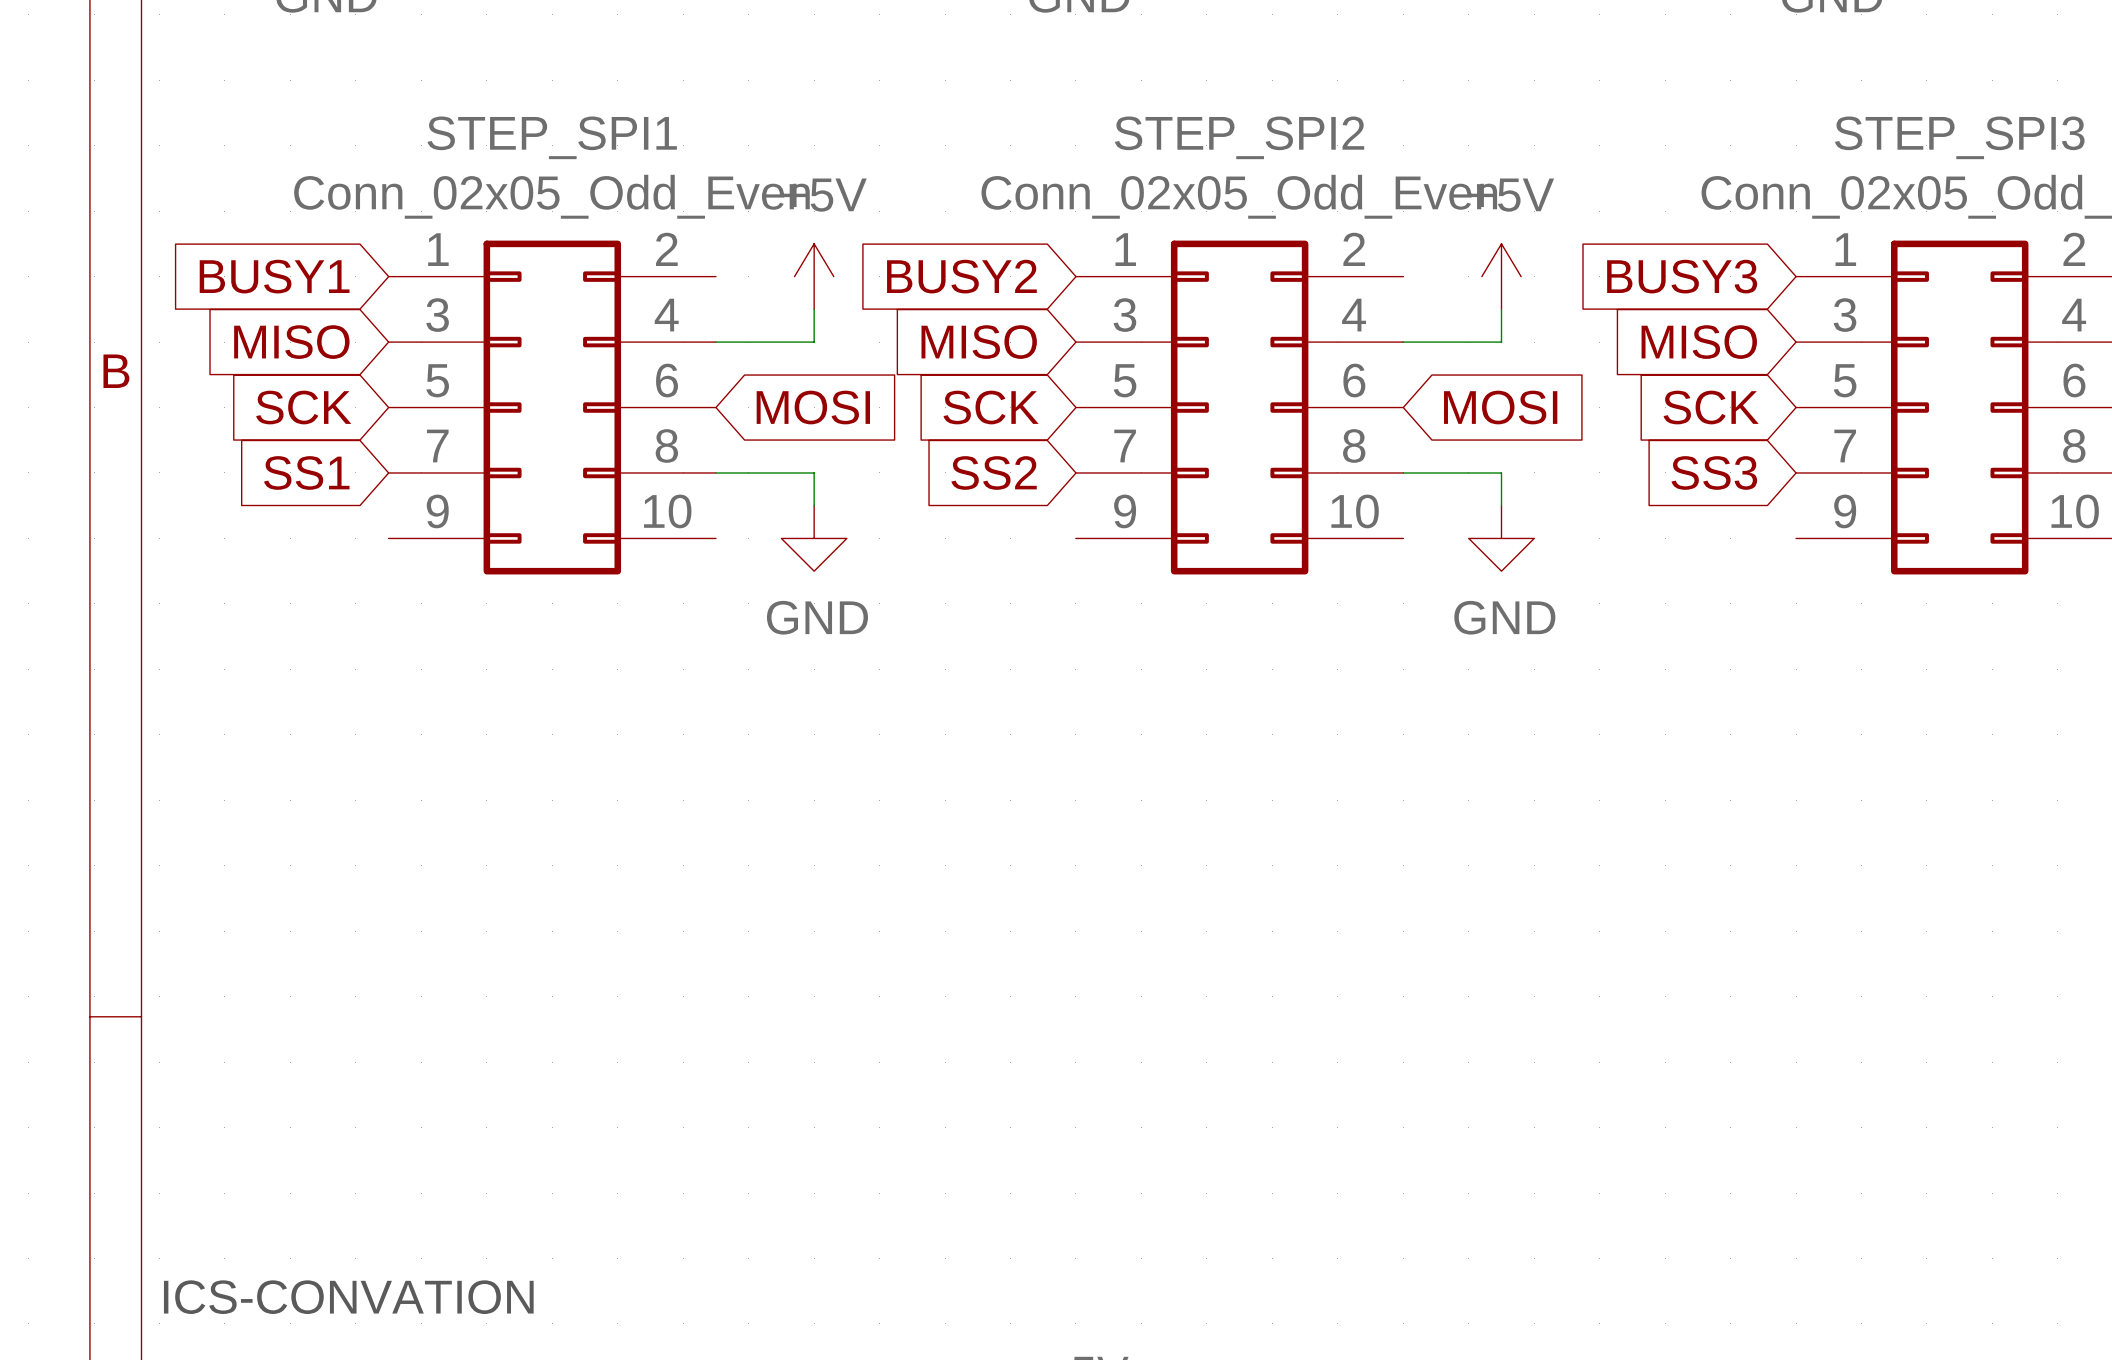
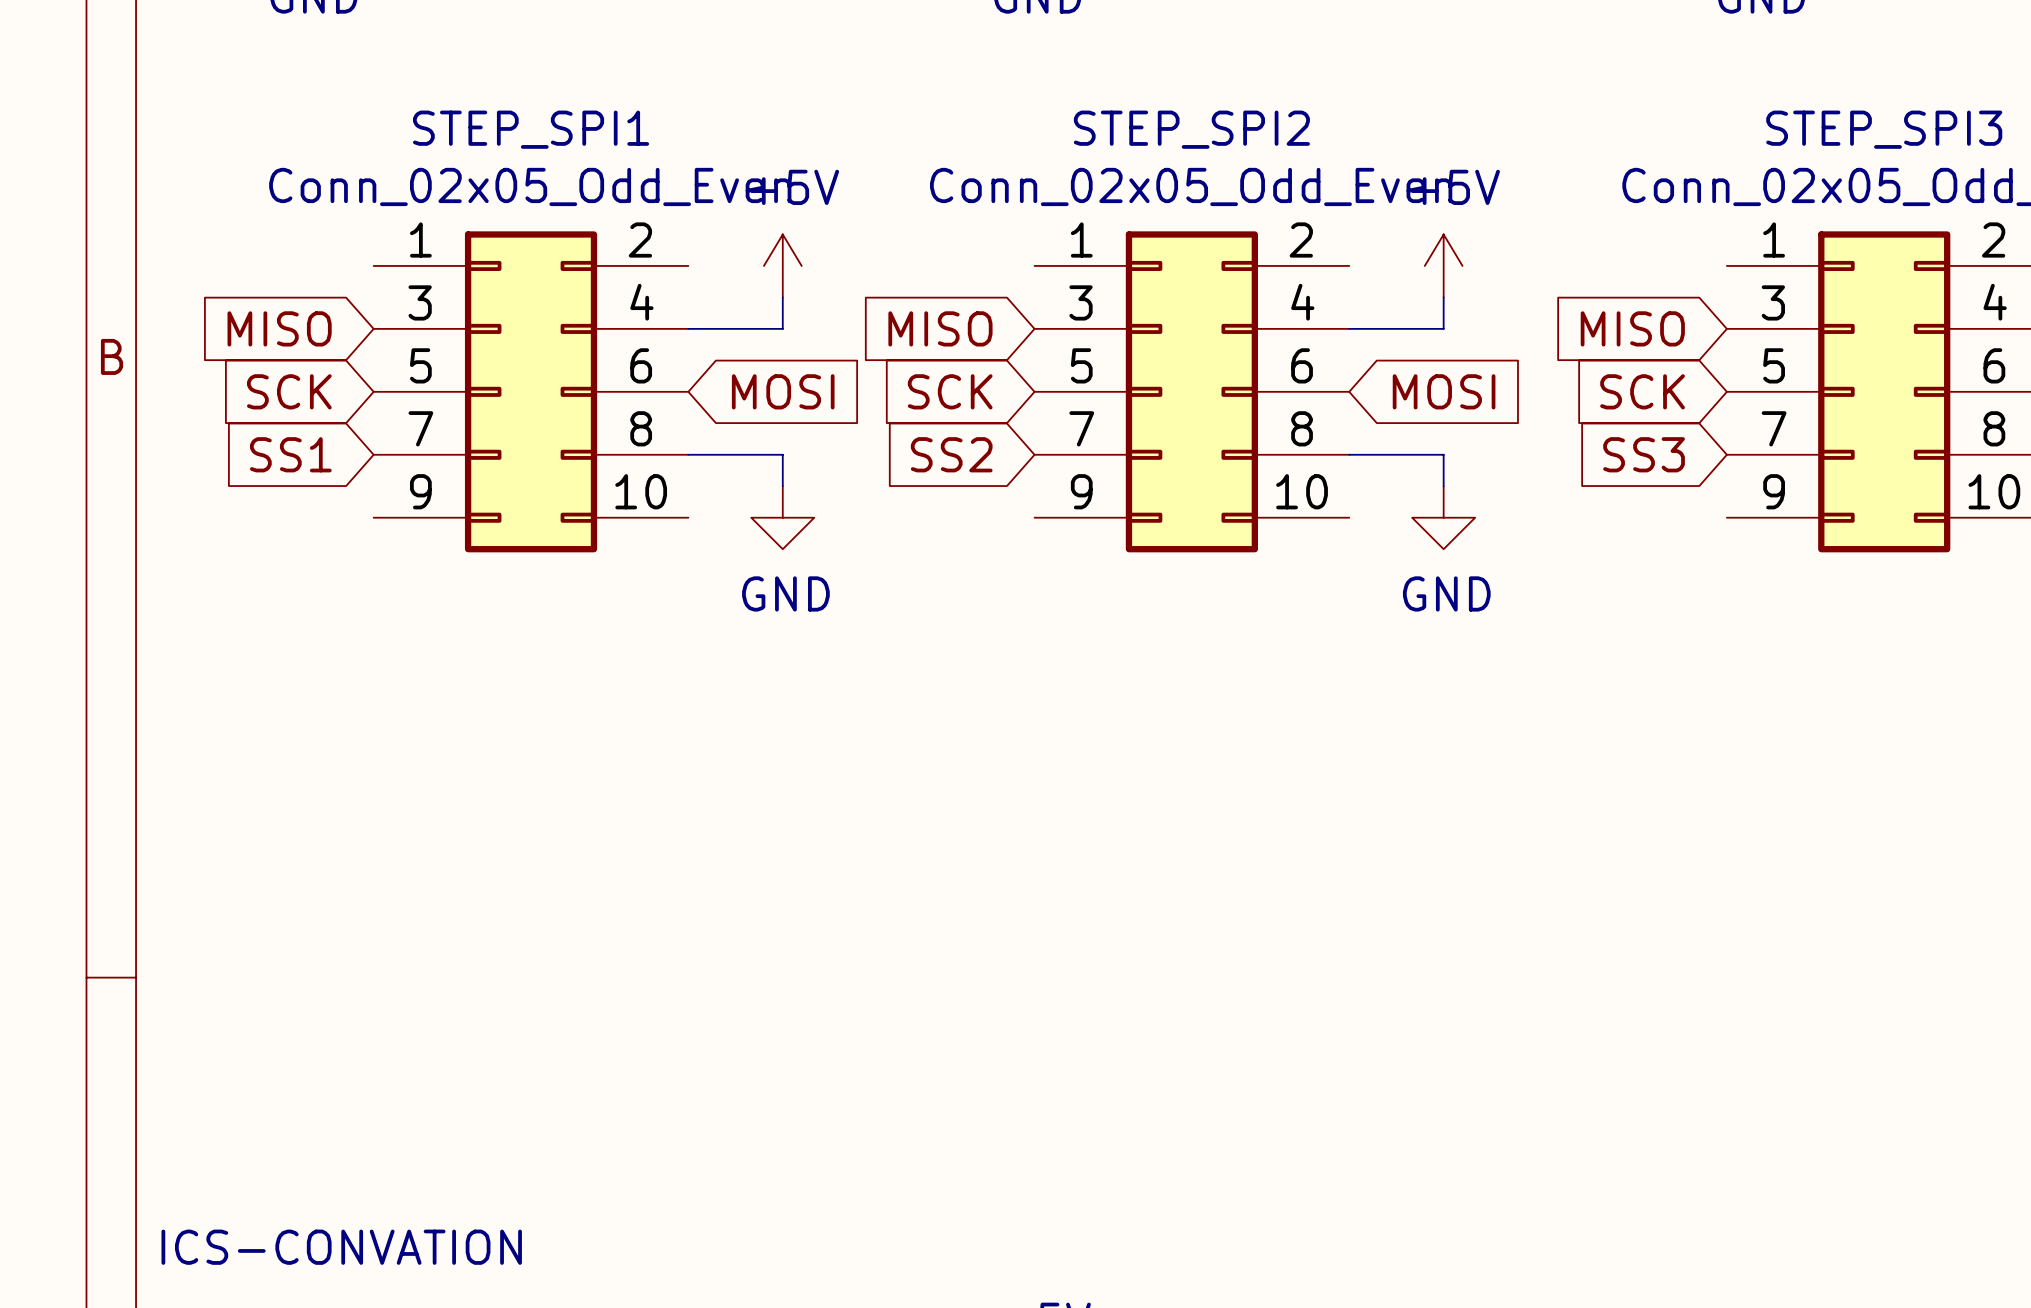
global label: BUSY1 (274, 276) -> none
global label: BUSY2 (961, 276) -> none
global label: BUSY3 (1682, 276) -> none

